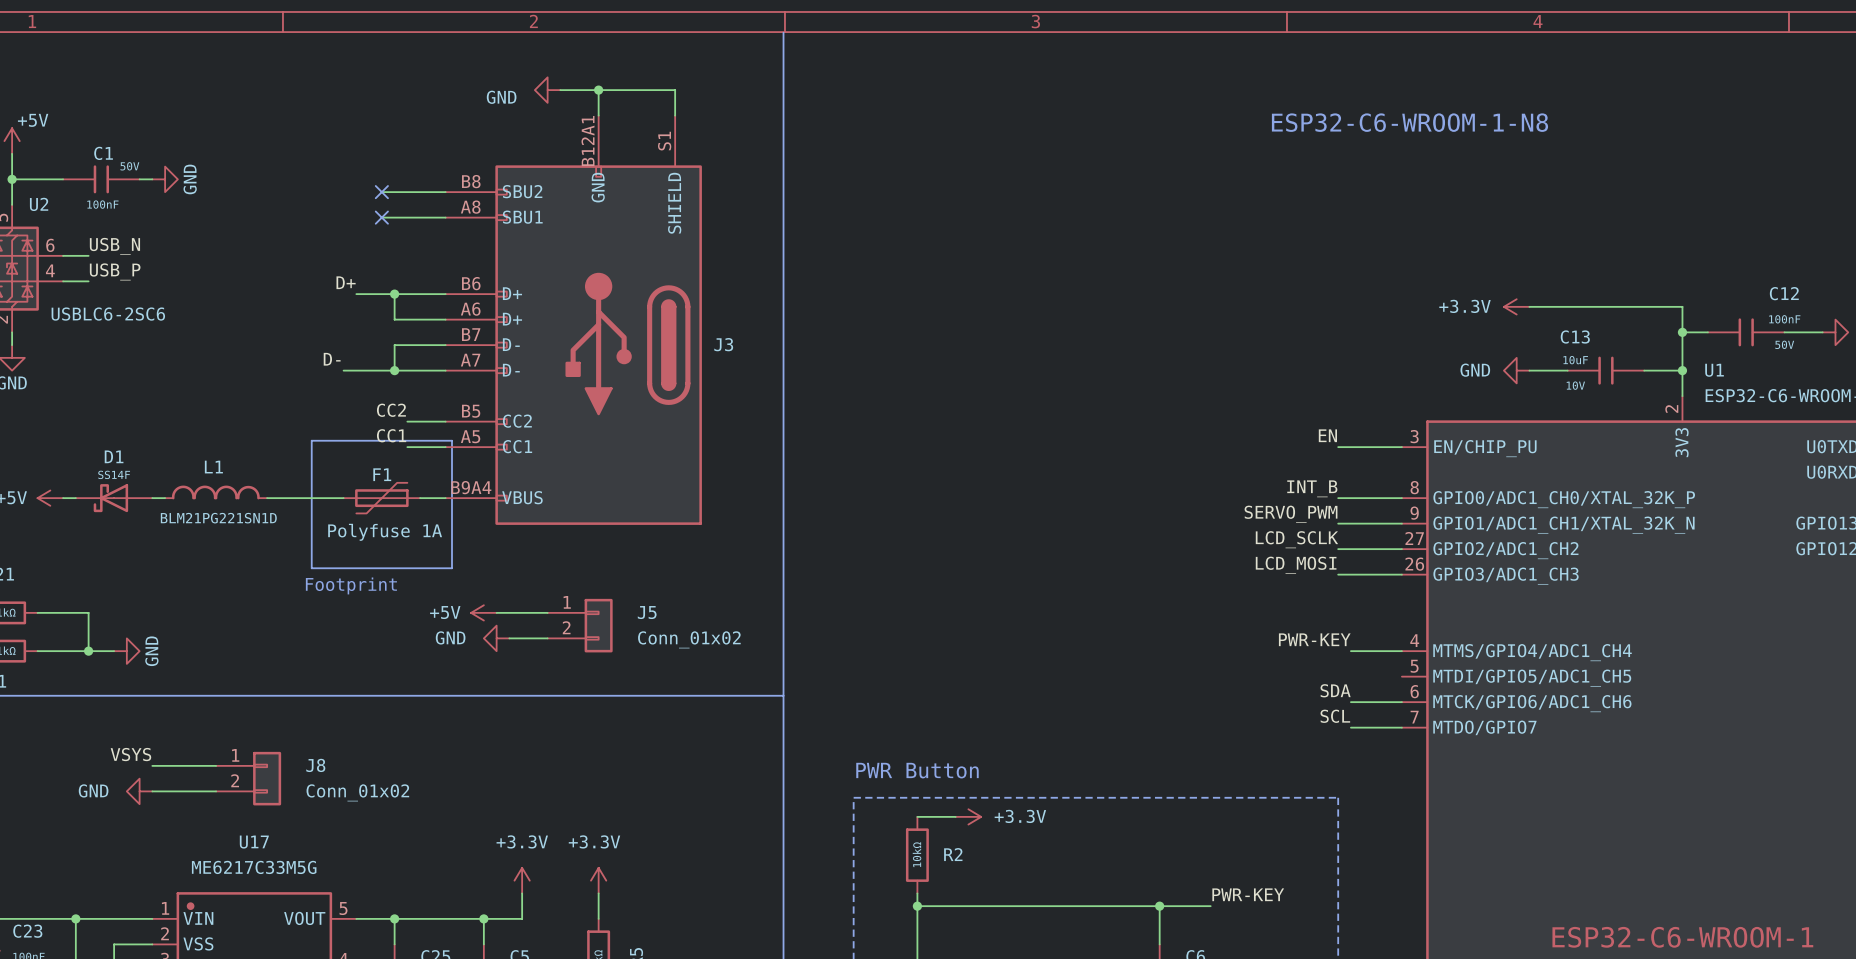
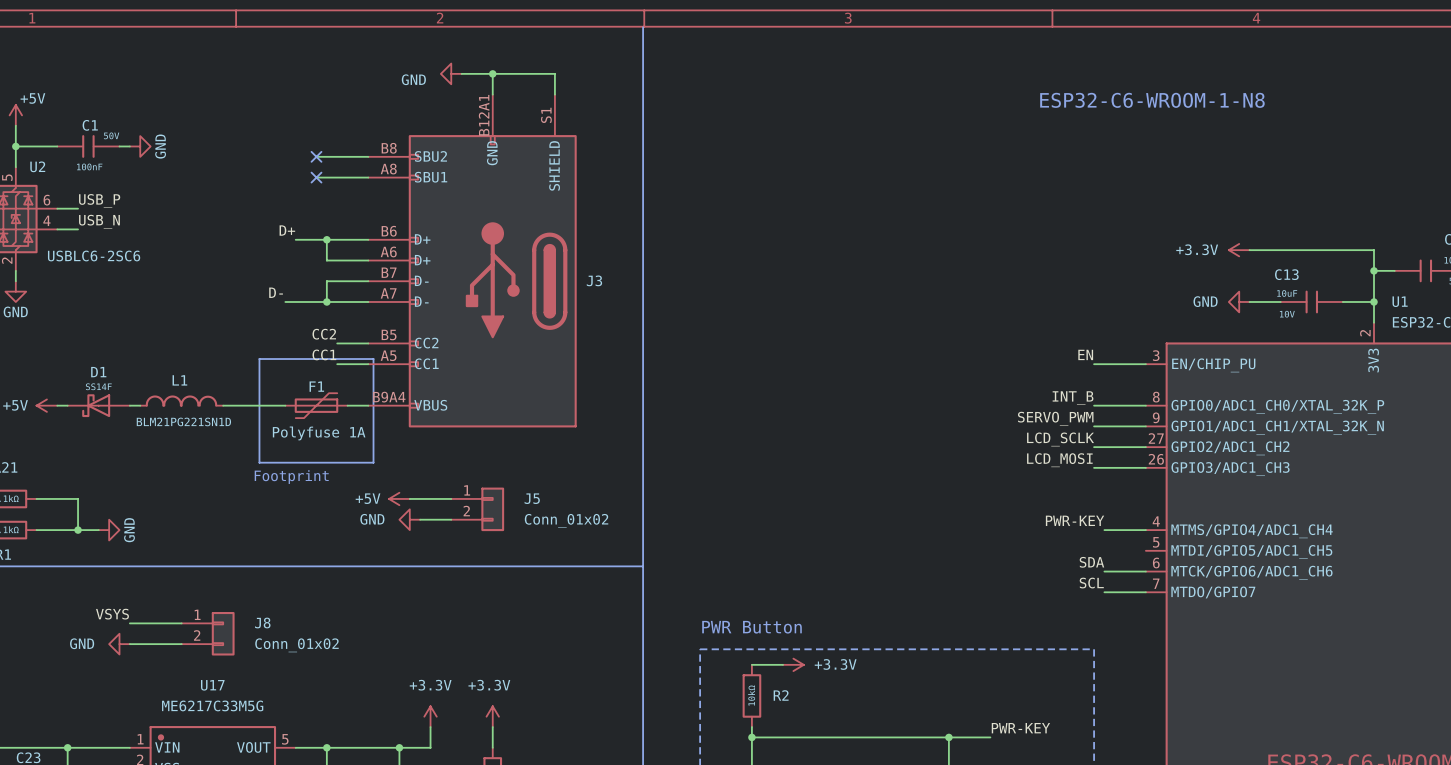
label: USB_N (114, 246) -> USB_P (99, 201)
label: USB_P (115, 271) -> USB_N (99, 221)

